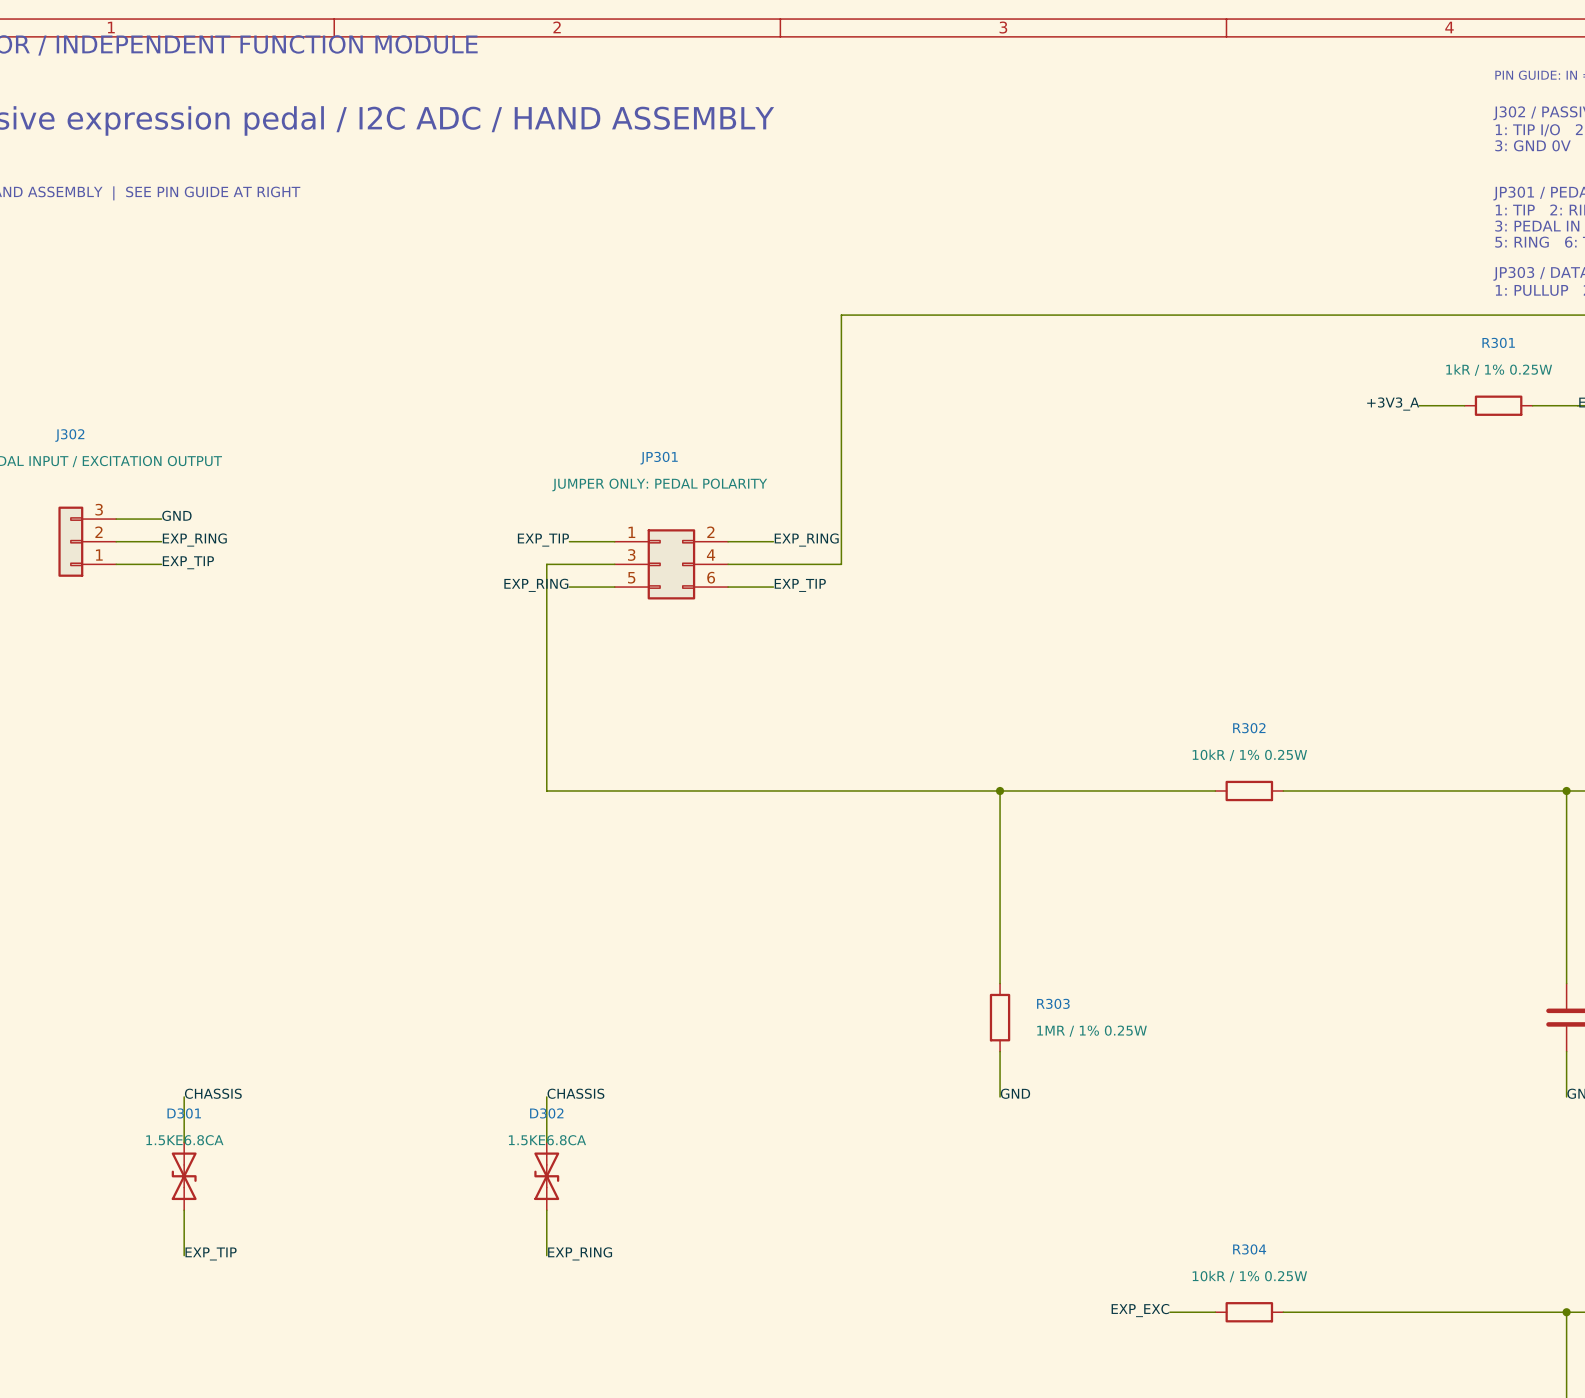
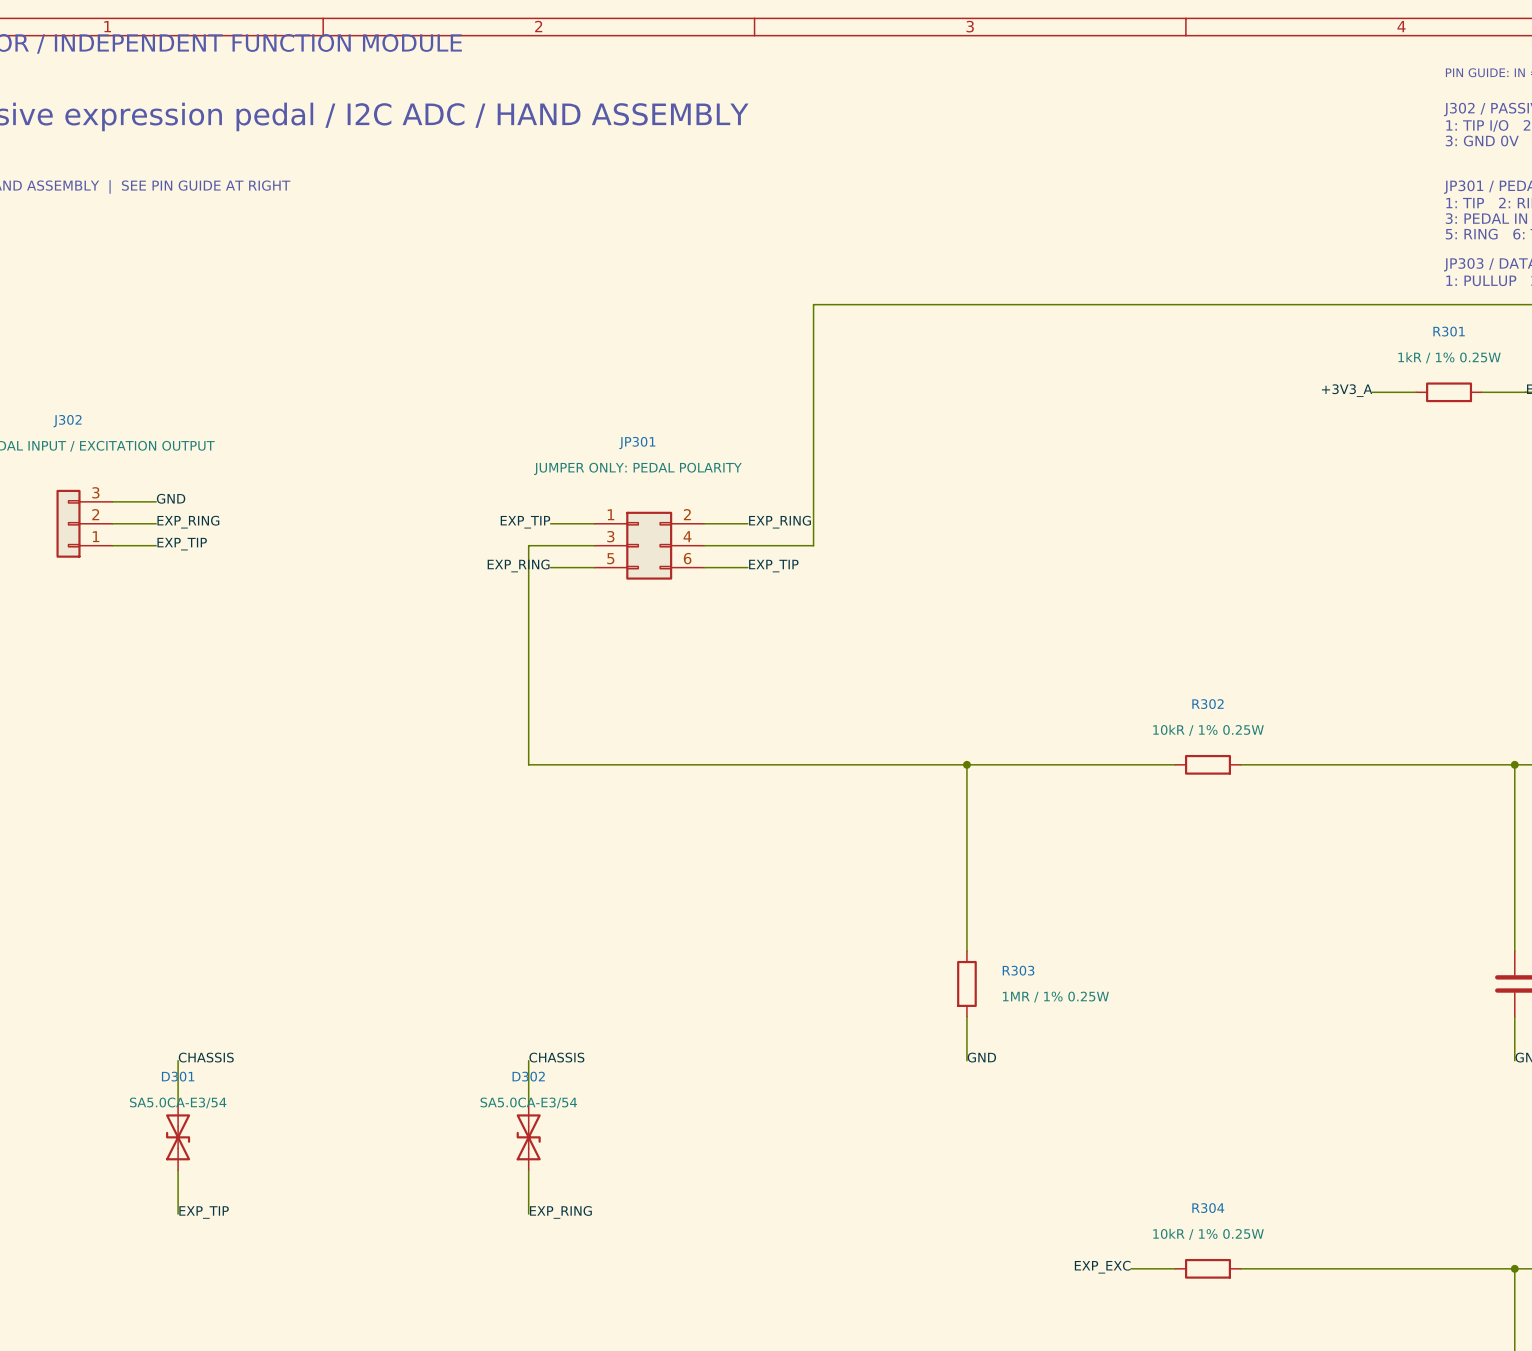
D301 value: 1.5KE6.8CA (184, 1140) -> SA5.0CA-E3/54 (178, 1103)
D302 value: 1.5KE6.8CA (547, 1140) -> SA5.0CA-E3/54 (528, 1103)

